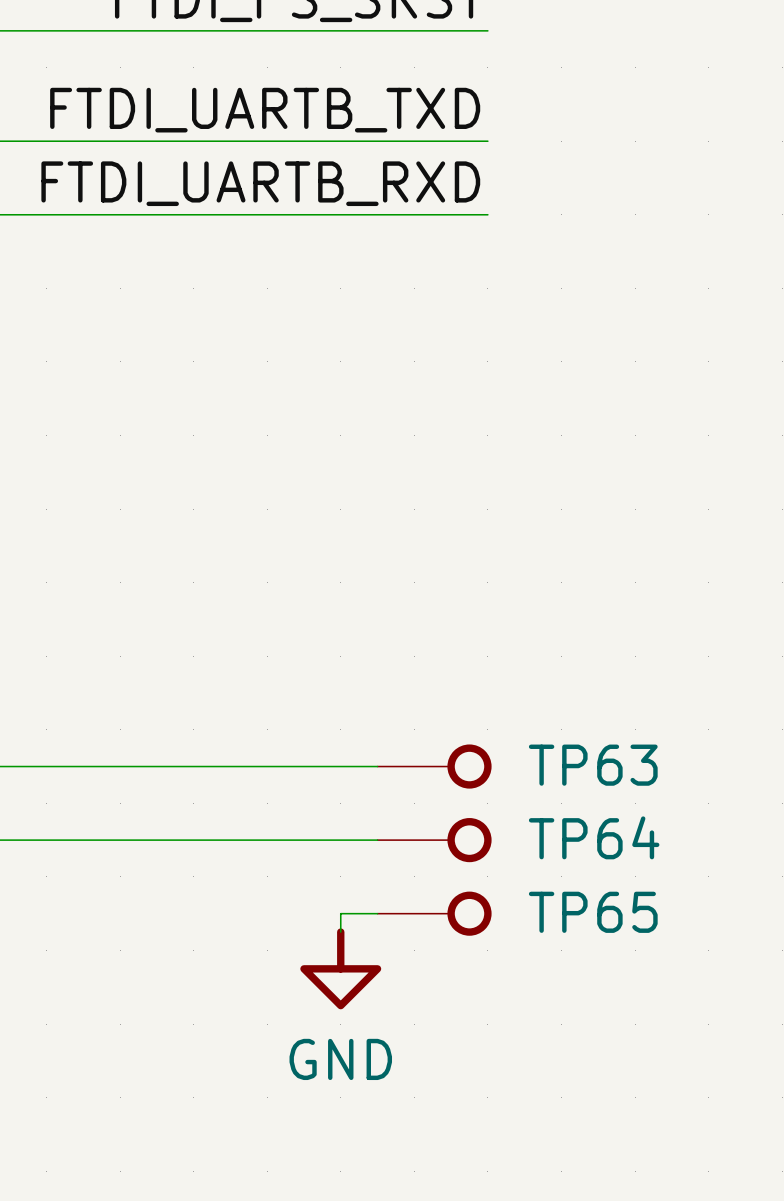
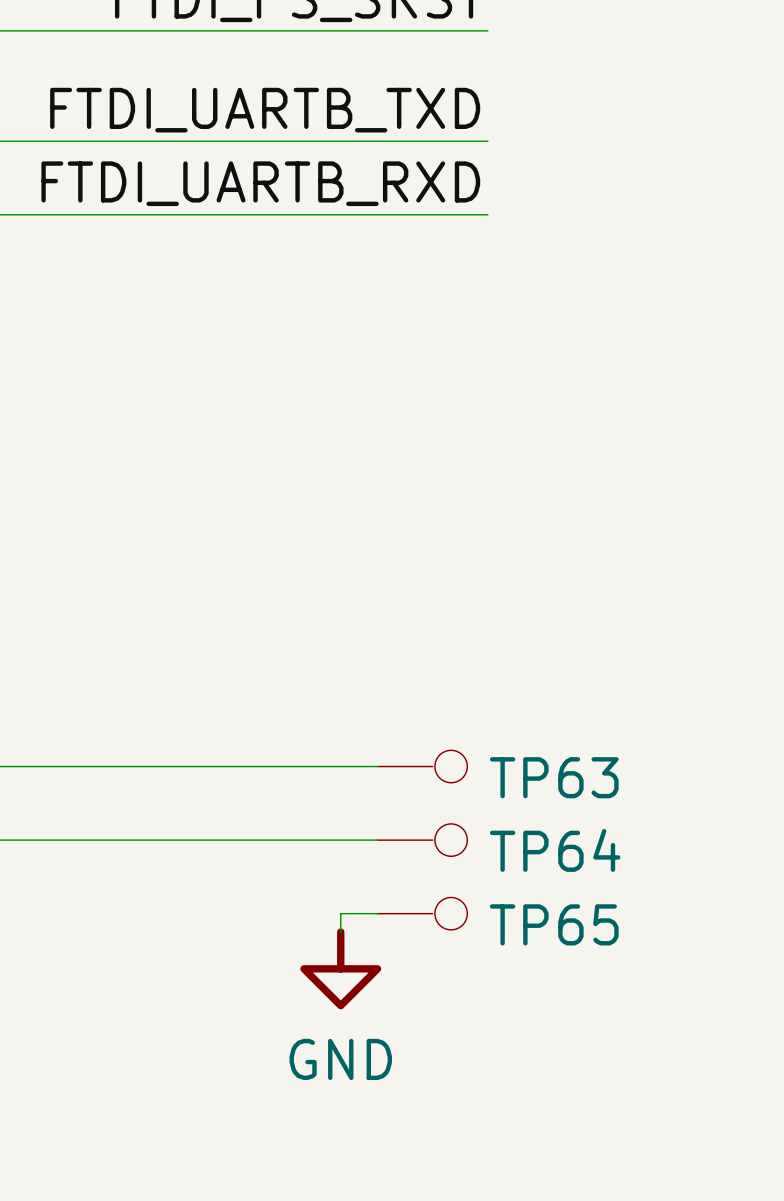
TP63 symbol: [377, 744, 492, 789] -> [377, 750, 468, 783]
TP63 name position: TP63 (593, 765) -> TP63 (554, 777)
TP64 symbol: [377, 818, 492, 863] -> [377, 823, 468, 857]
TP64 name position: TP64 (594, 837) -> TP64 (555, 850)
TP65 symbol: [377, 891, 492, 936] -> [377, 897, 468, 930]
TP65 name position: TP65 (593, 912) -> TP65 (554, 924)

